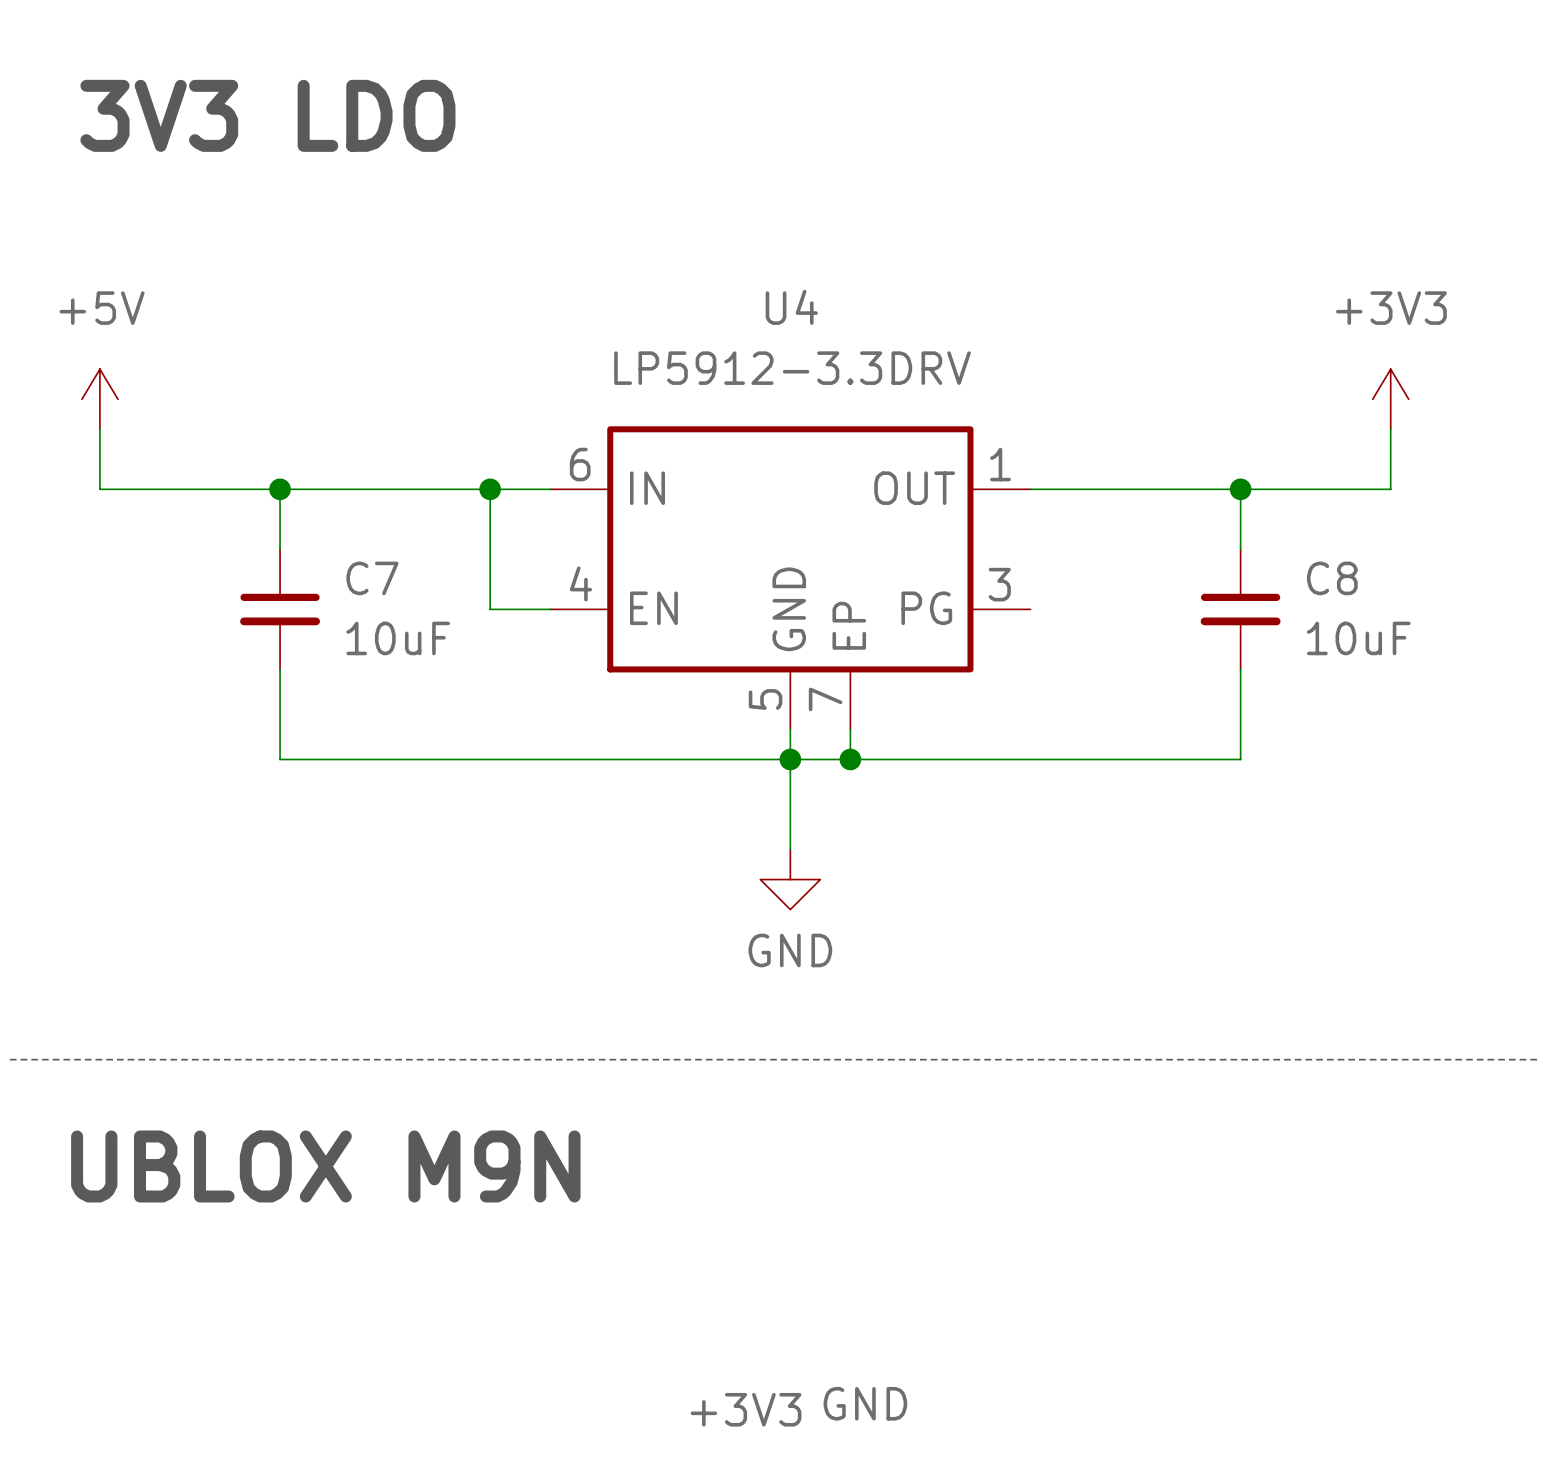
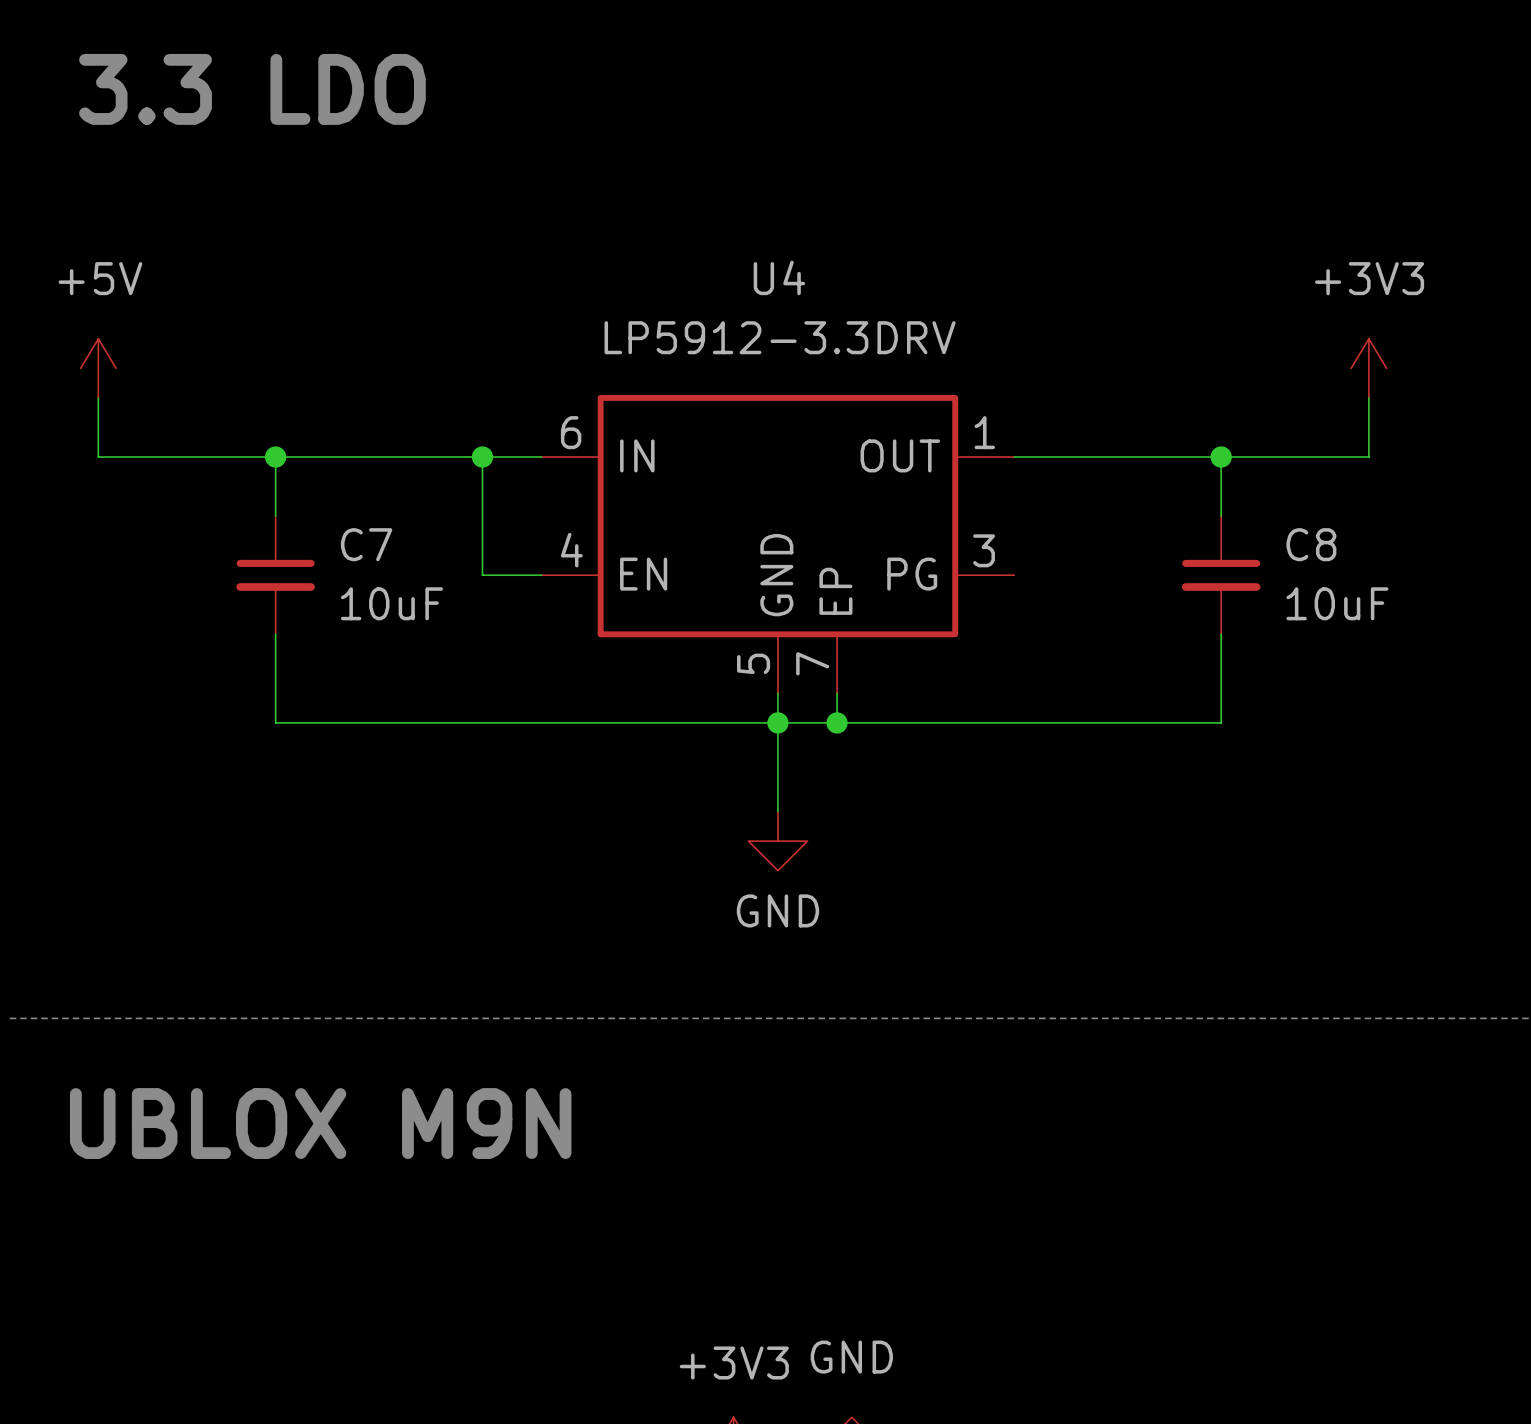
text: 3V3 LDO (267, 115) -> 3.3 LDO (252, 89)

